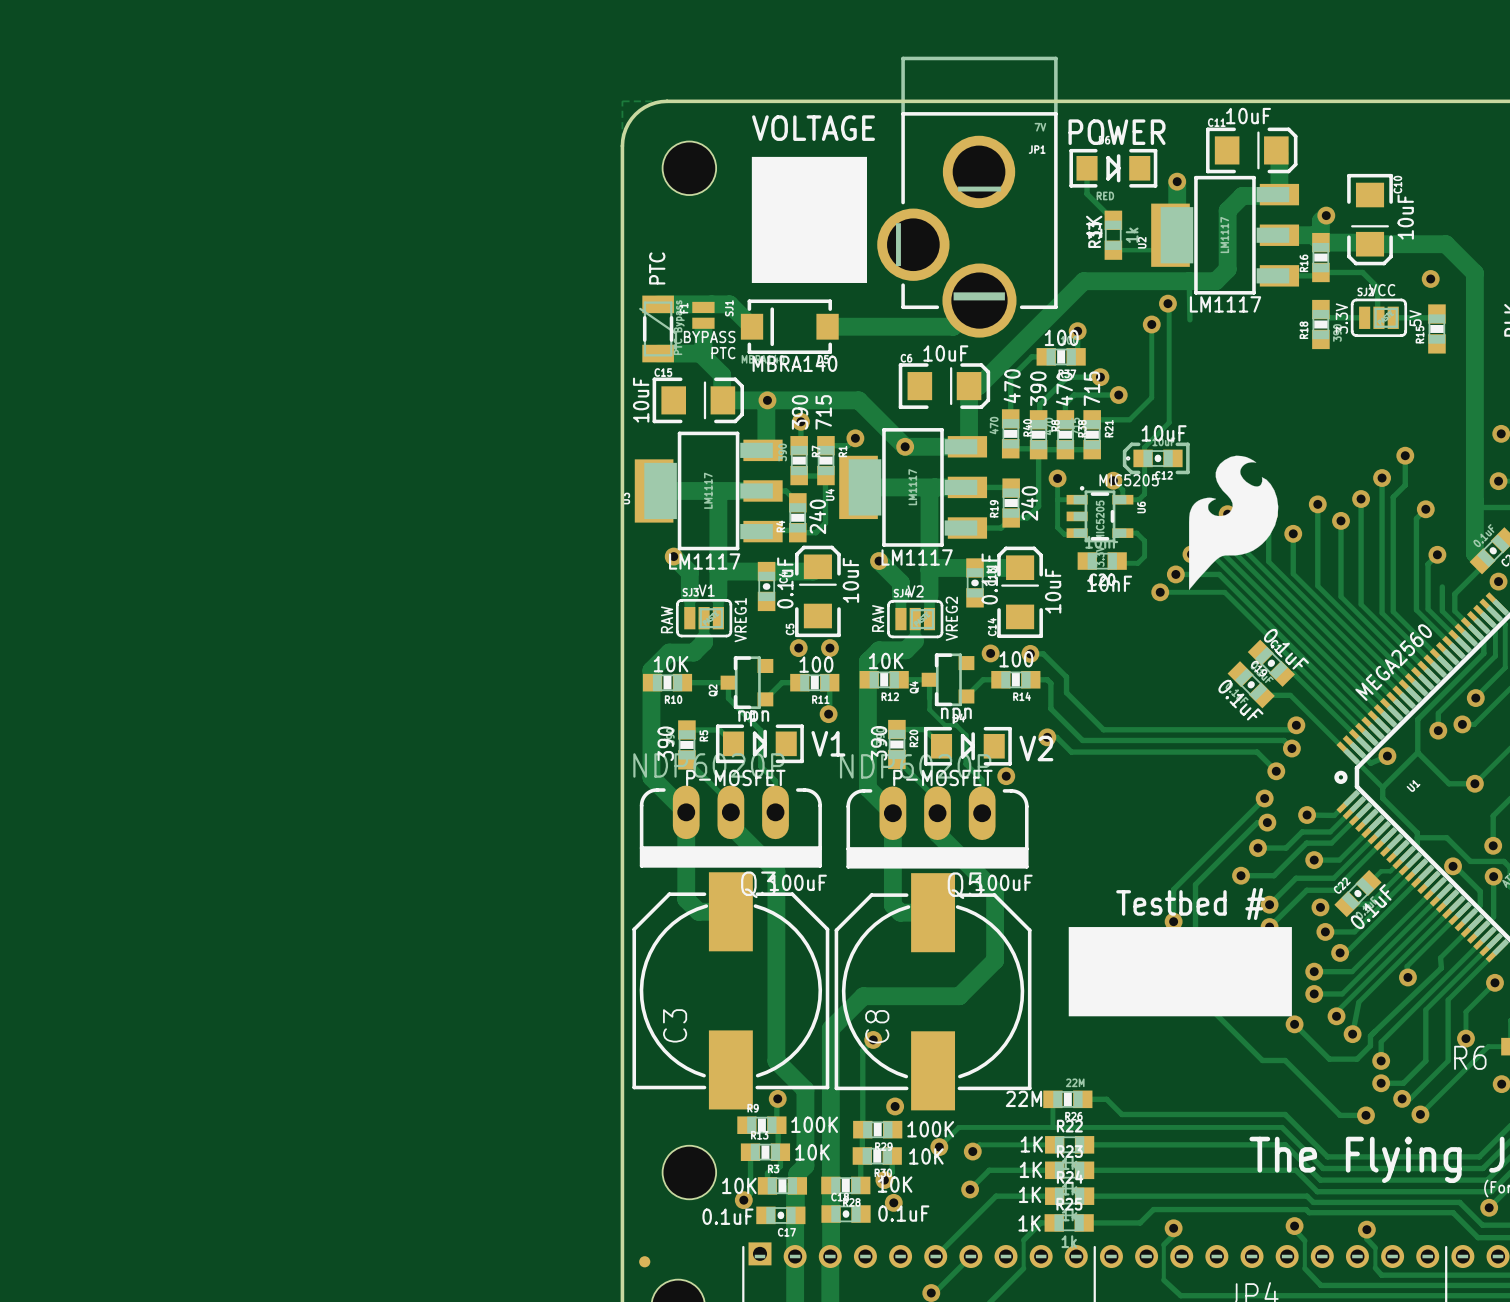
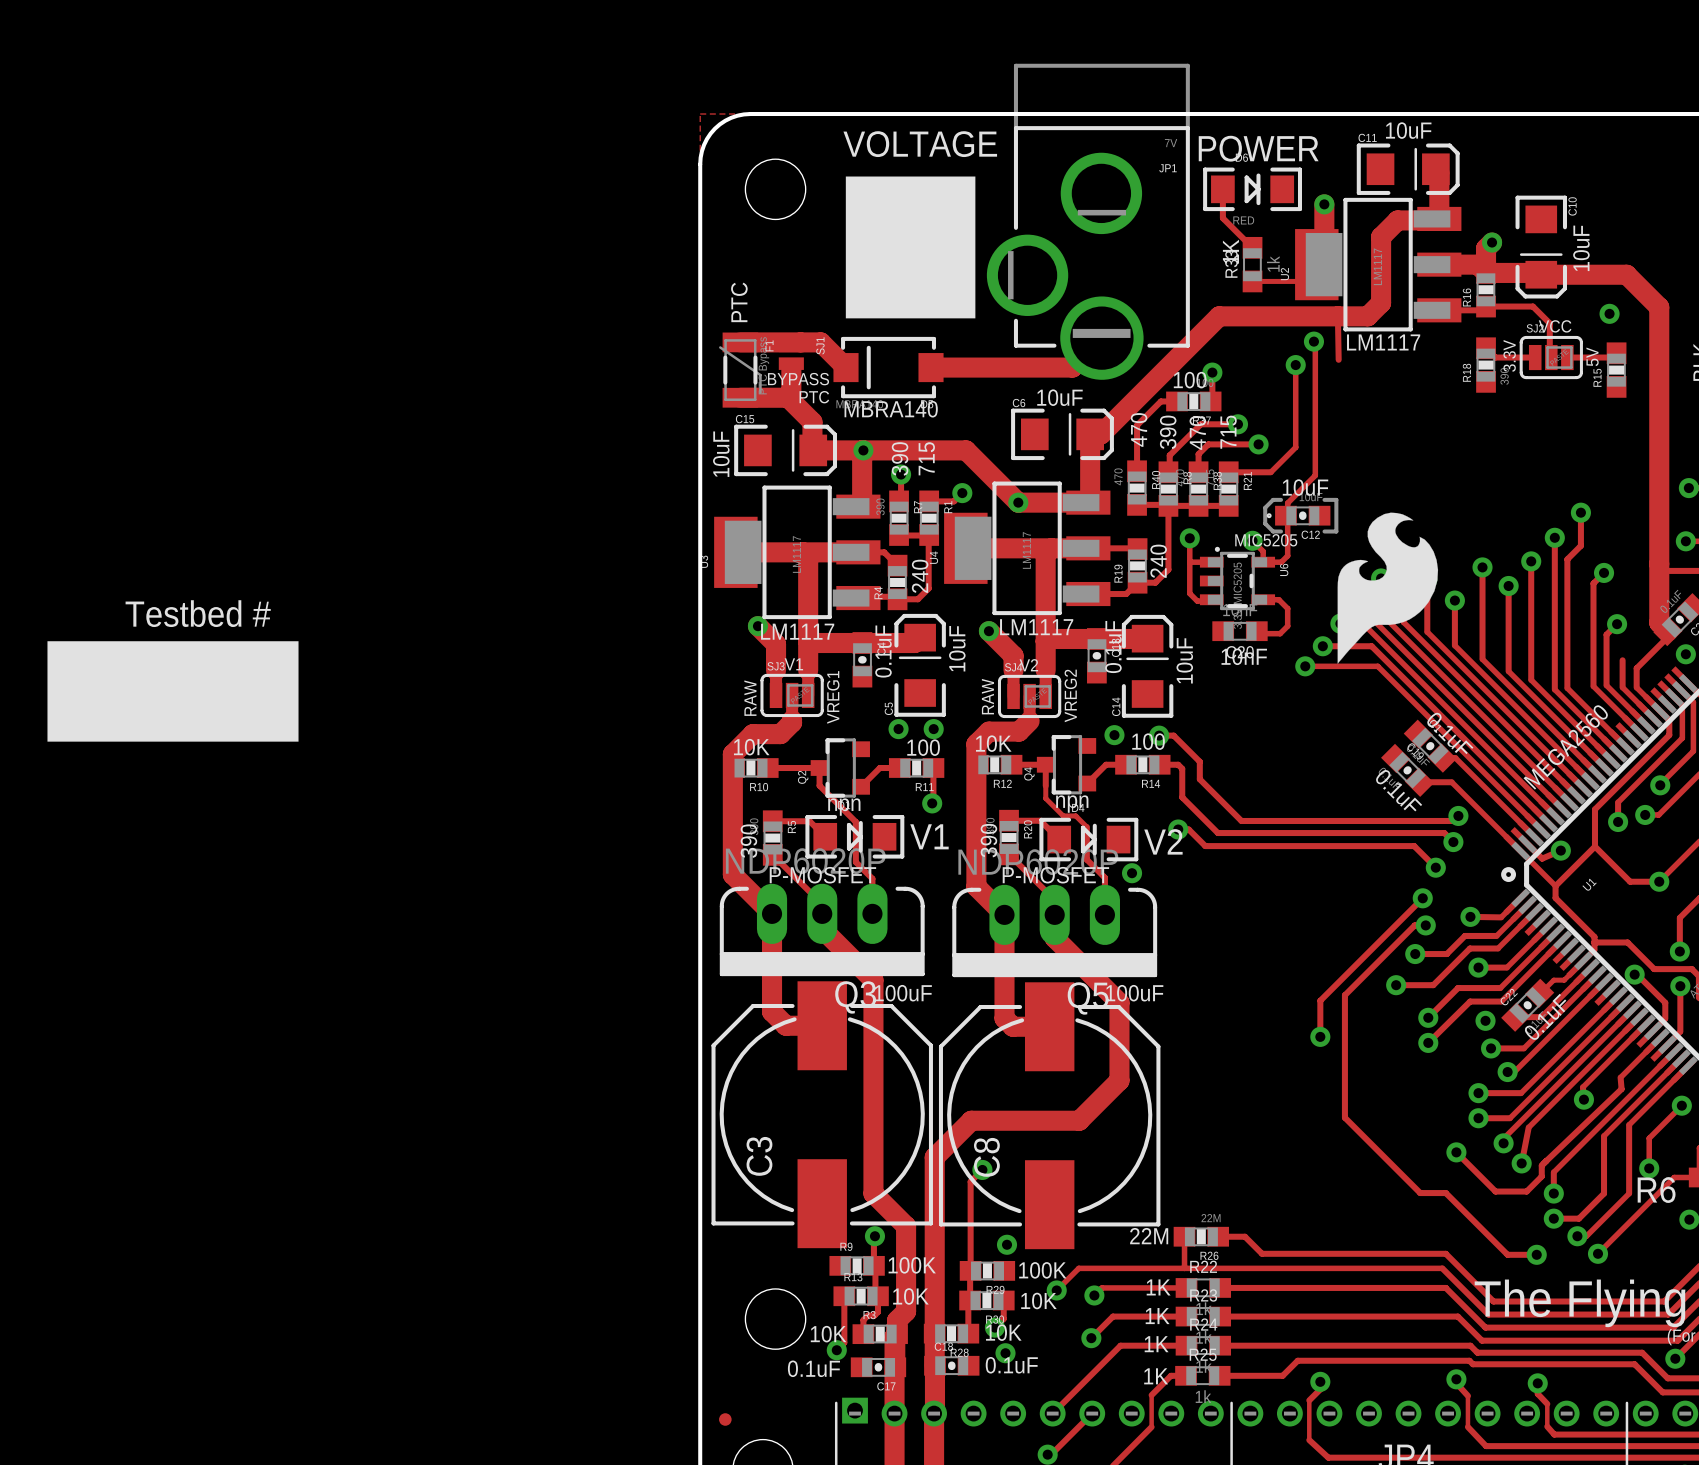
text: none -> Testbed # (198, 613)
drawing: none -> [47, 641, 299, 742]
text: Testbed # (1190, 904) -> none
drawing: [1068, 927, 1292, 1017] -> none

